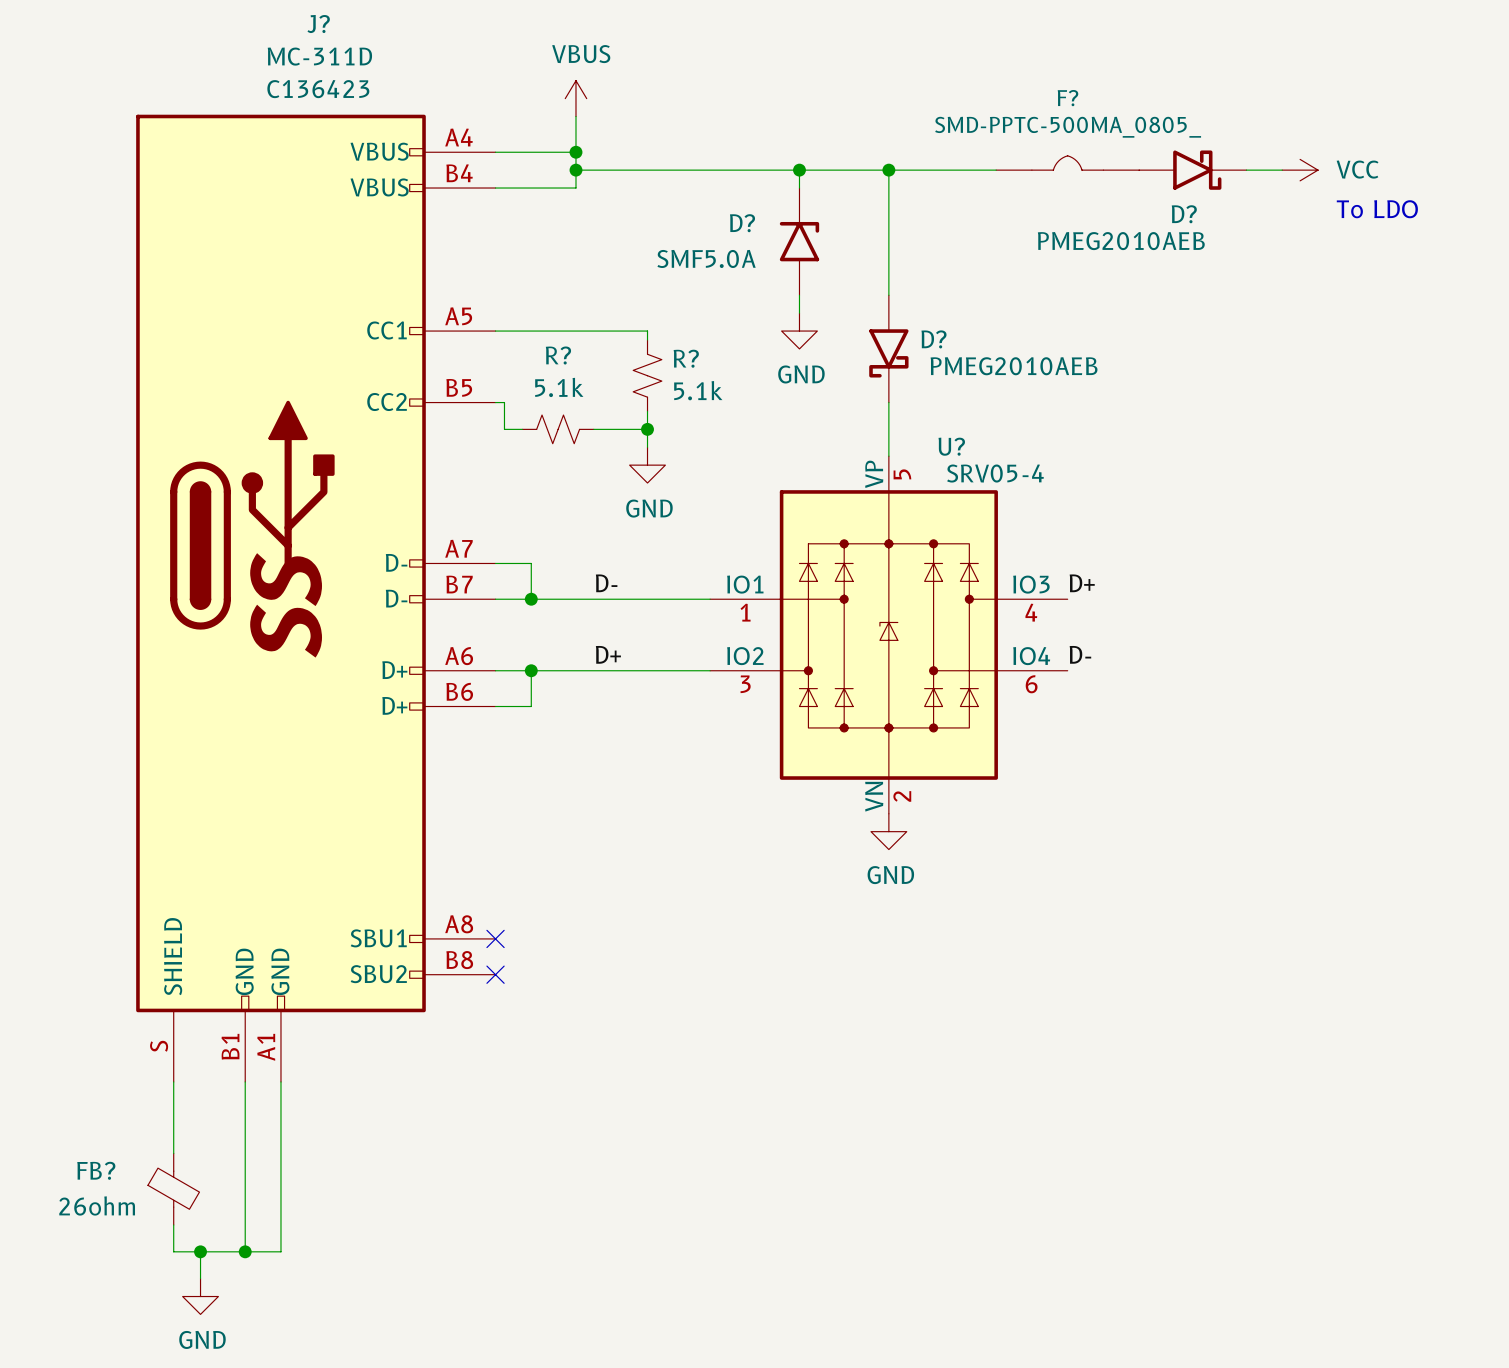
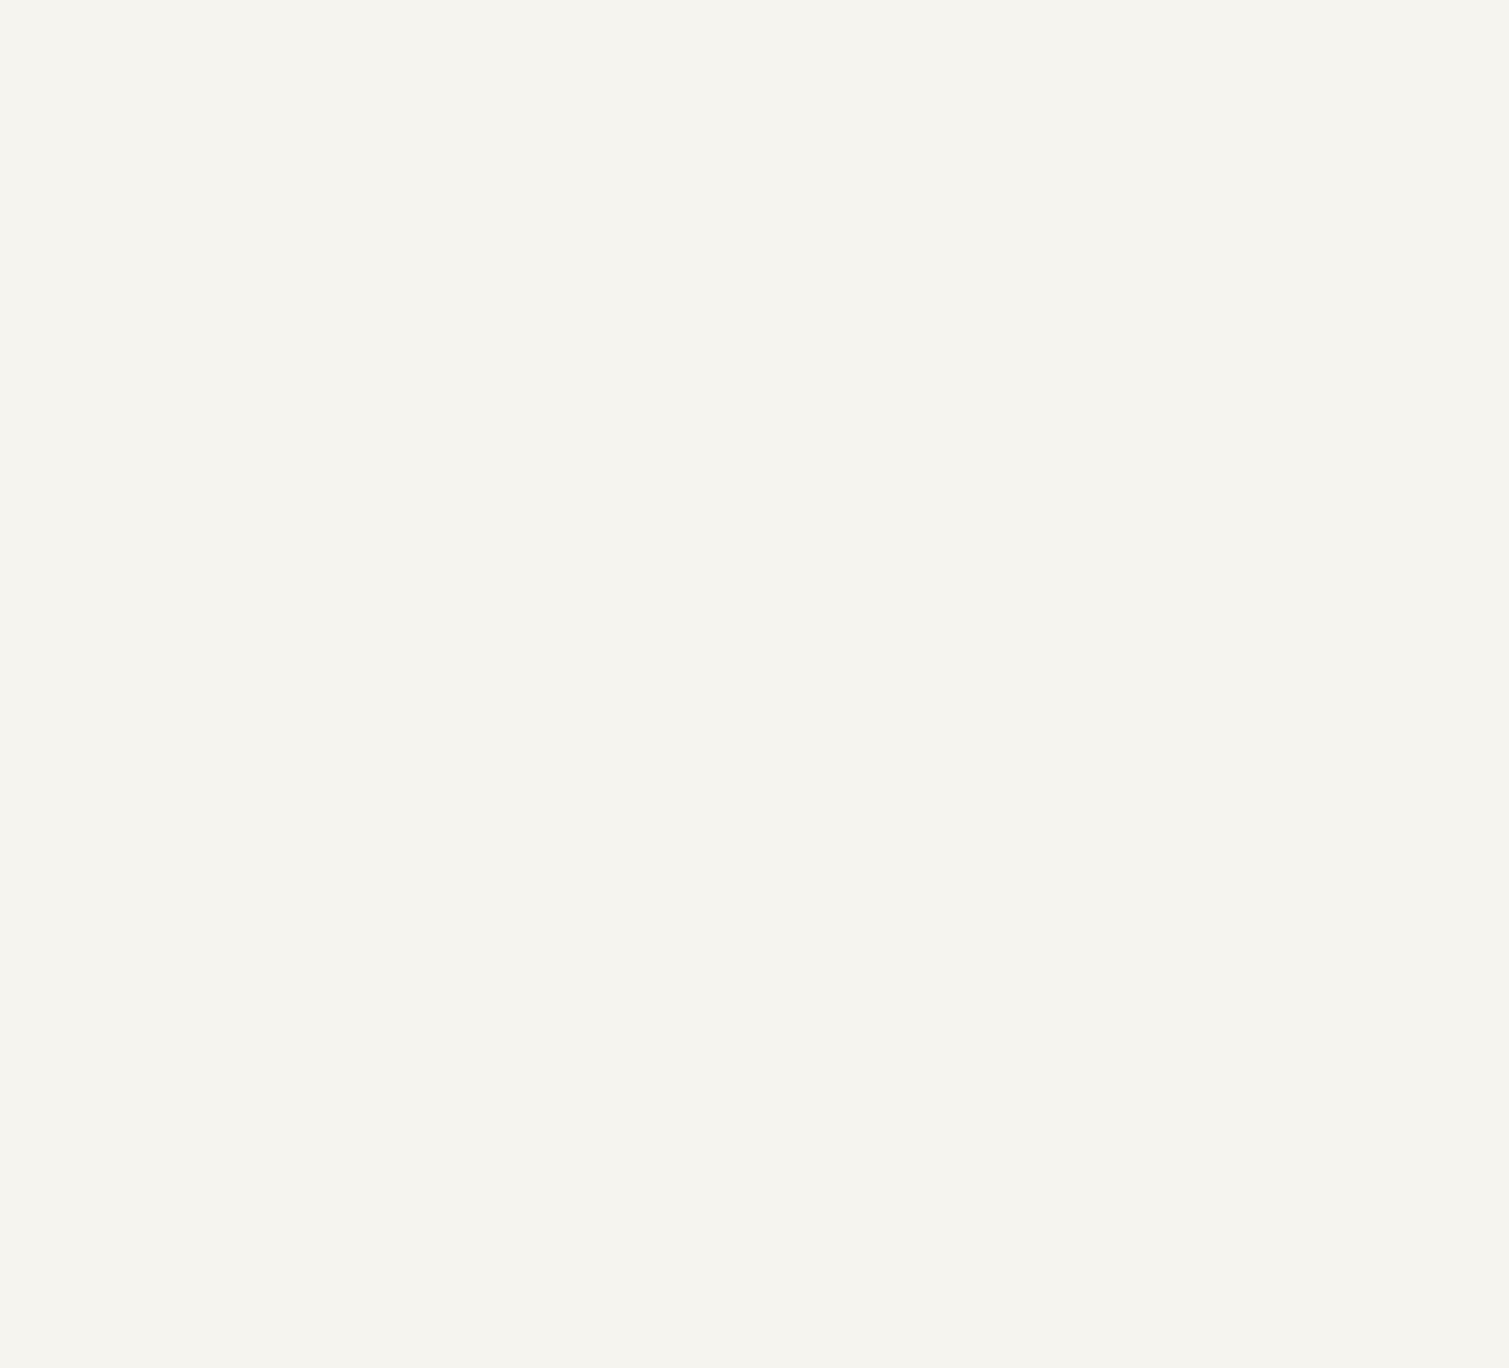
power symbol: VBUS (575, 98) -> none
wire: (575, 116) (575, 188) (495, 188) -> none
wire: (495, 152) (575, 152) -> none
junction: (575, 152) -> none
F?: SMD-PPTC-500MA_0805_ (1067, 162) -> none
wire: (575, 170) (996, 170) -> none
junction: (575, 170) -> none
wire: (799, 170) (799, 188) -> none
junction: (799, 170) -> none
wire: (888, 170) (888, 295) -> none
junction: (888, 170) -> none
D?: PMEG2010AEB (1192, 170) -> none
wire: (1246, 170) (1282, 170) -> none
power symbol: VCC (1300, 170) -> none
text: To LDO (1377, 209) -> none
D?: SMF5.0A (799, 241) -> none
wire: (799, 295) (799, 313) -> none
wire: (495, 331) (647, 331) (647, 339) -> none
power symbol: GND (799, 331) -> none
D?: PMEG2010AEB (888, 348) -> none
R?: (647, 375) -> none
wire: (495, 402) (504, 402) (504, 429) (522, 429) -> none
wire: (888, 402) (888, 456) -> none
wire: (647, 411) (647, 447) -> none
R?: (558, 429) -> none
wire: (593, 429) (647, 429) -> none
junction: (647, 429) -> none
power symbol: GND (647, 465) -> none
wire: (495, 563) (531, 563) (531, 599) -> none
label: D- (606, 583) -> none
label: D+ (1082, 583) -> none
J?: MC-311D (315, 598) -> none
wire: (495, 599) (710, 599) -> none
junction: (531, 599) -> none
U?: SRV05-4 (888, 634) -> none
label: D+ (608, 654) -> none
label: D- (1080, 654) -> none
wire: (495, 670) (710, 670) -> none
wire: (531, 670) (531, 706) (495, 706) -> none
junction: (531, 670) -> none
power symbol: GND (888, 831) -> none
no-connect mark: (495, 938) -> none
no-connect mark: (495, 974) -> none
wire: (173, 1081) (173, 1153) -> none
wire: (245, 1081) (245, 1251) -> none
wire: (280, 1081) (280, 1251) (173, 1251) (173, 1225) -> none
FB?: (173, 1189) -> none
wire: (200, 1251) (200, 1278) -> none
junction: (200, 1251) -> none
junction: (245, 1251) -> none
power symbol: GND (200, 1296) -> none

